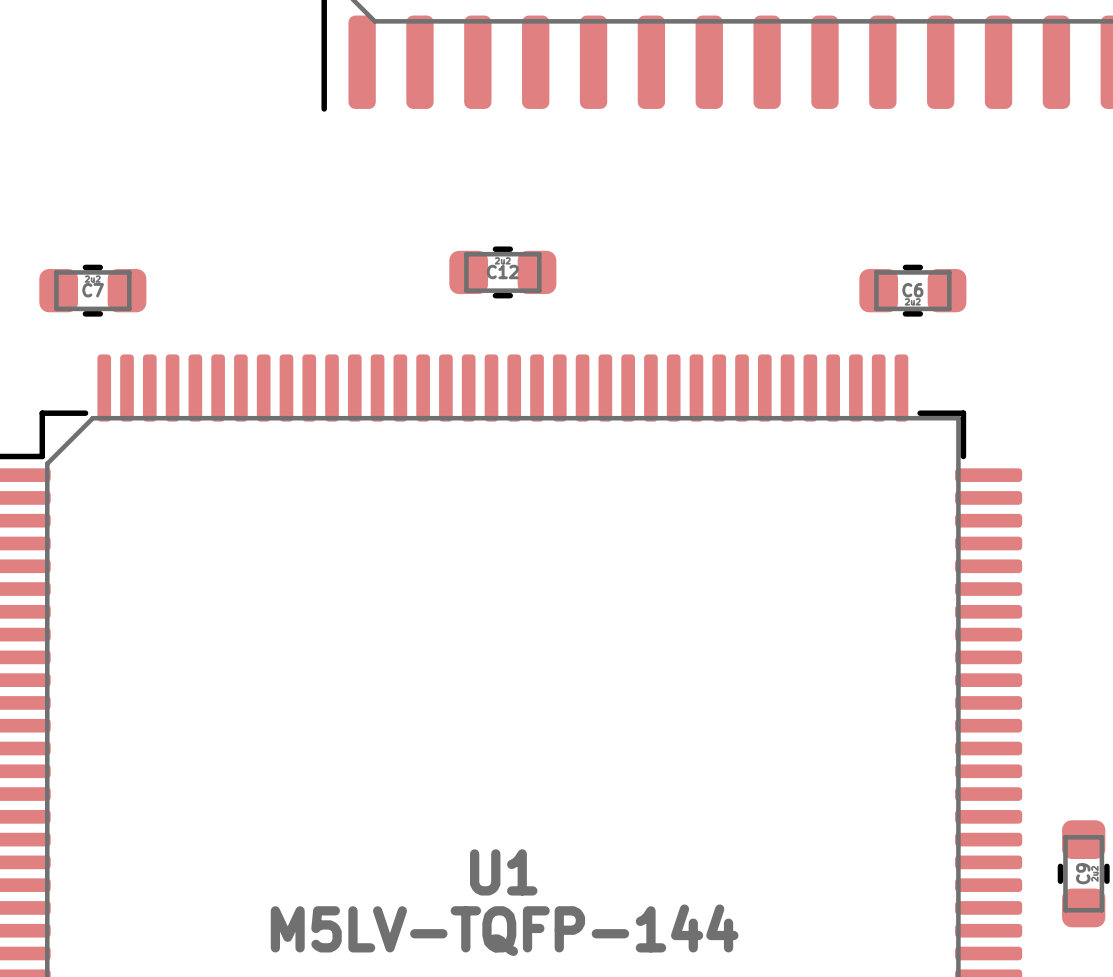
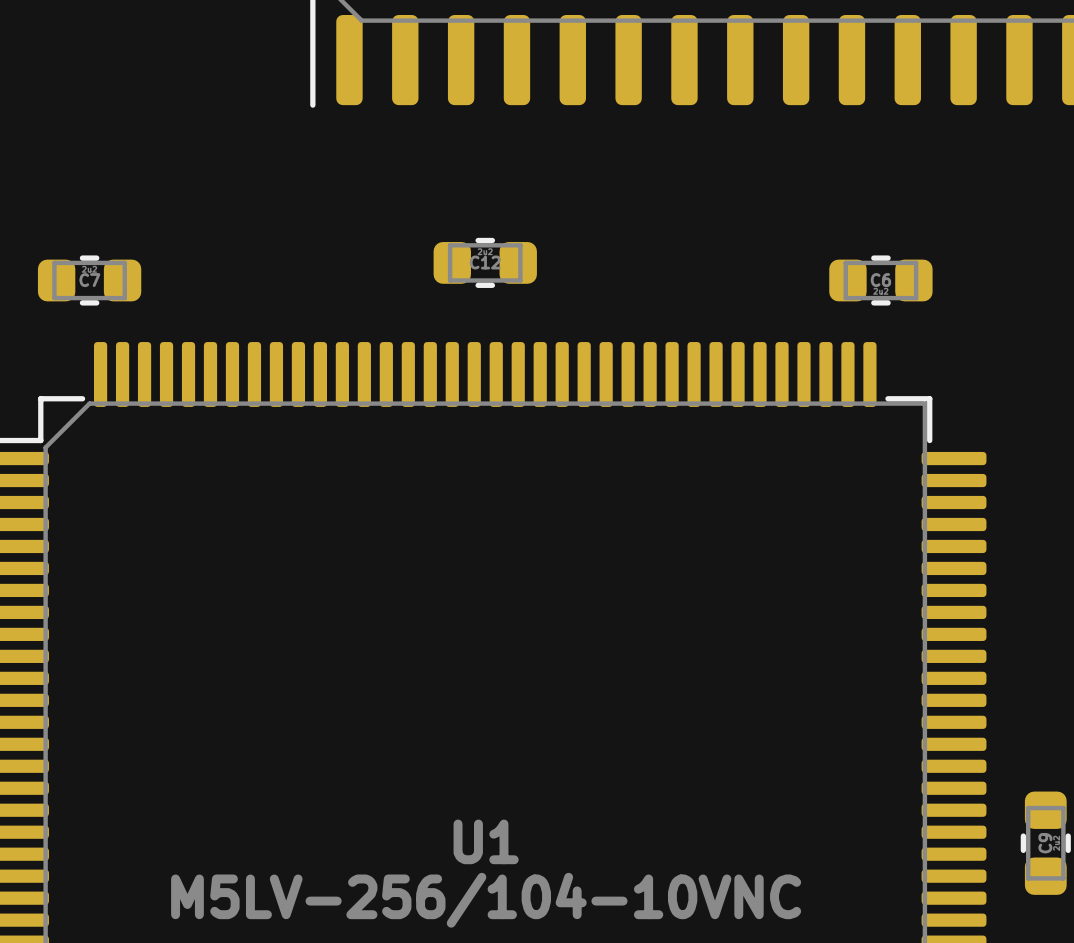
U1 value: M5LV-TQFP-144 (504, 930) -> M5LV-256/104-10VNC (486, 900)

